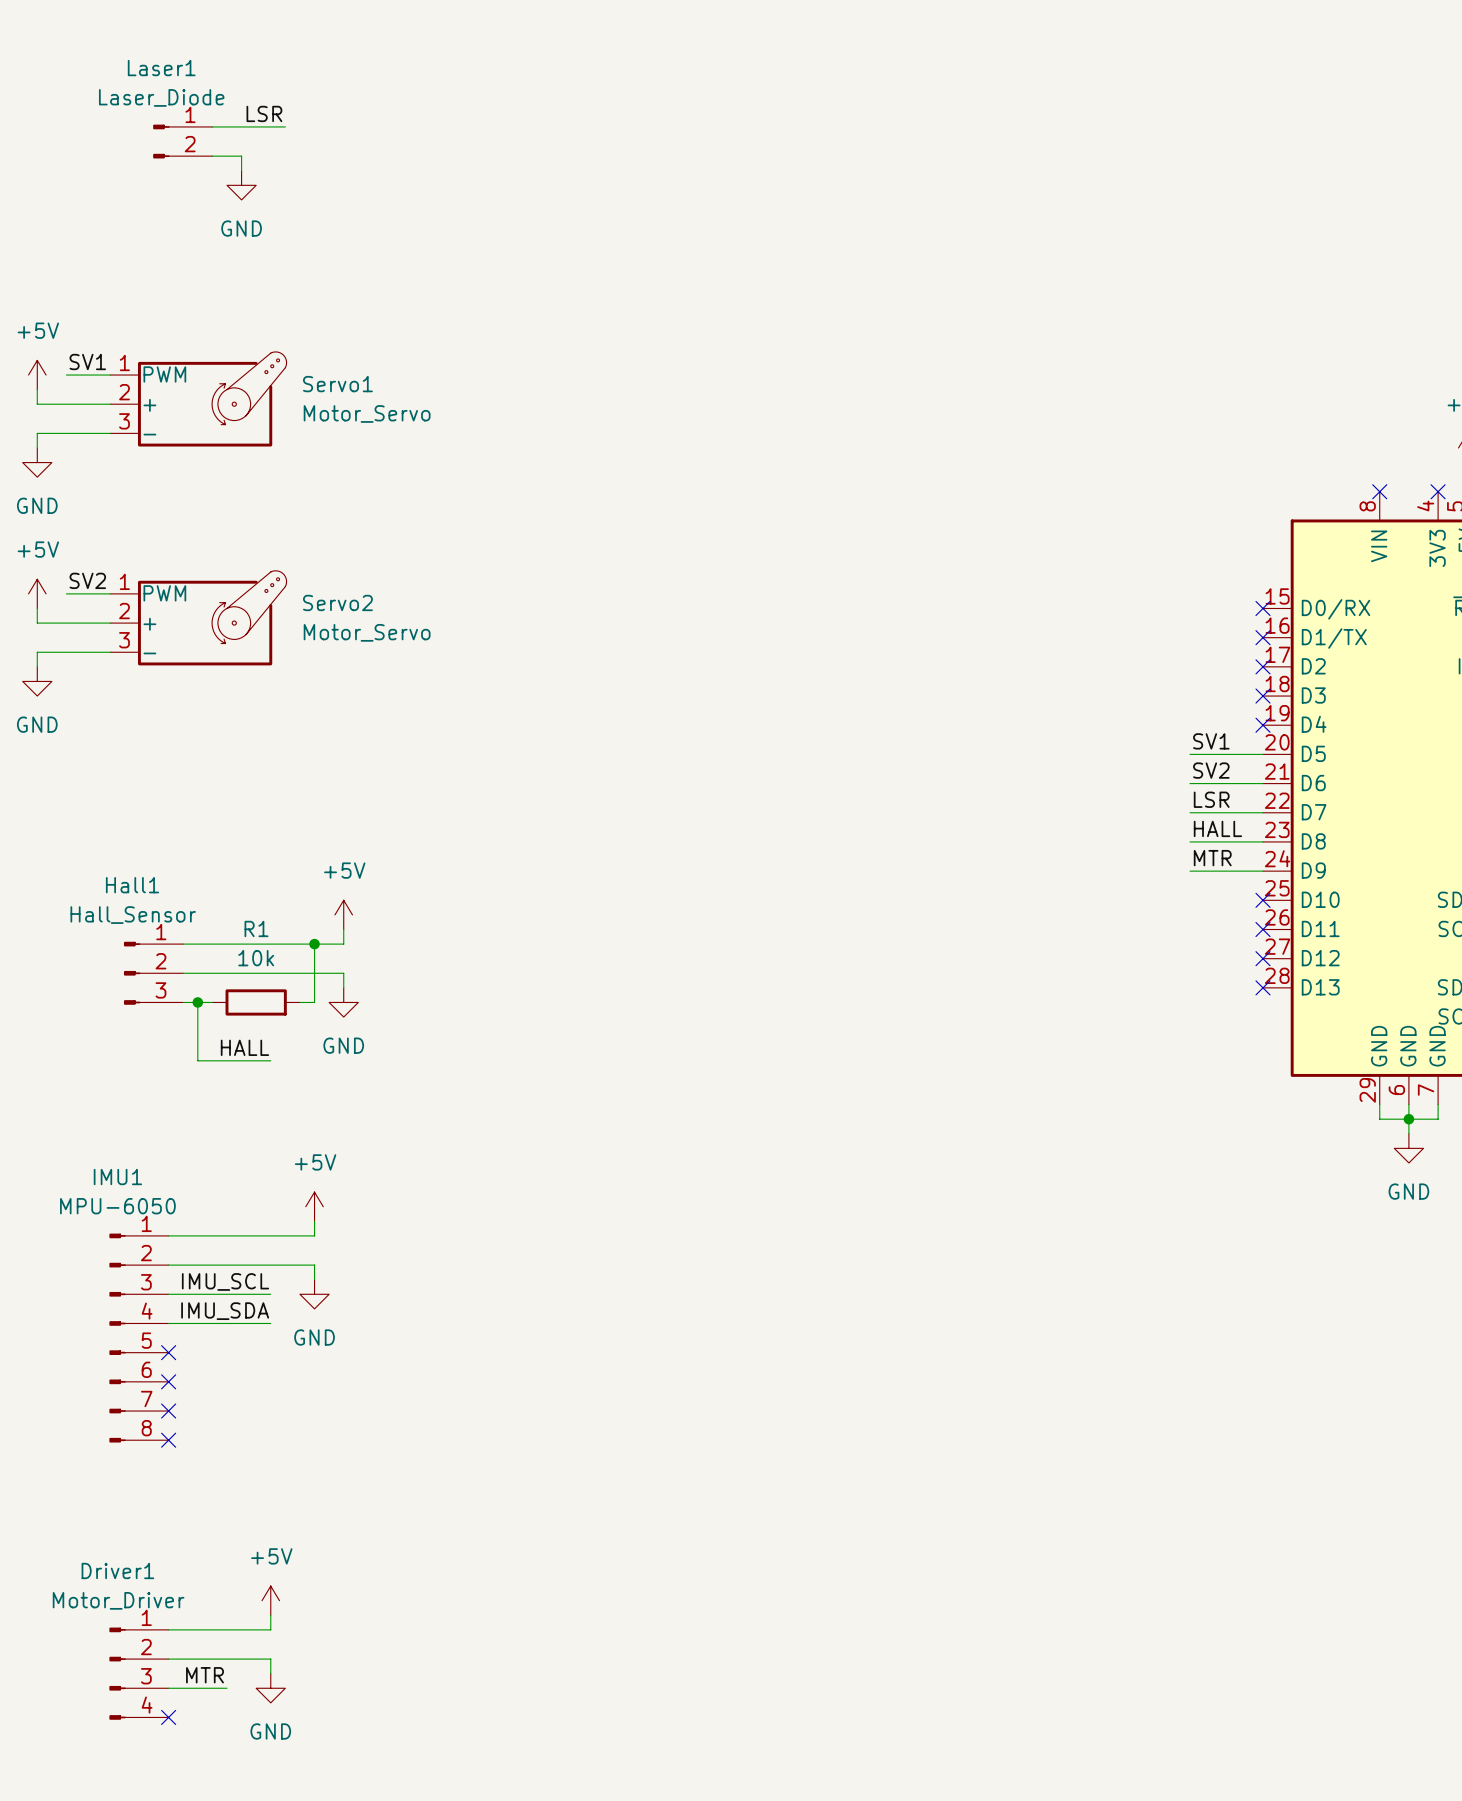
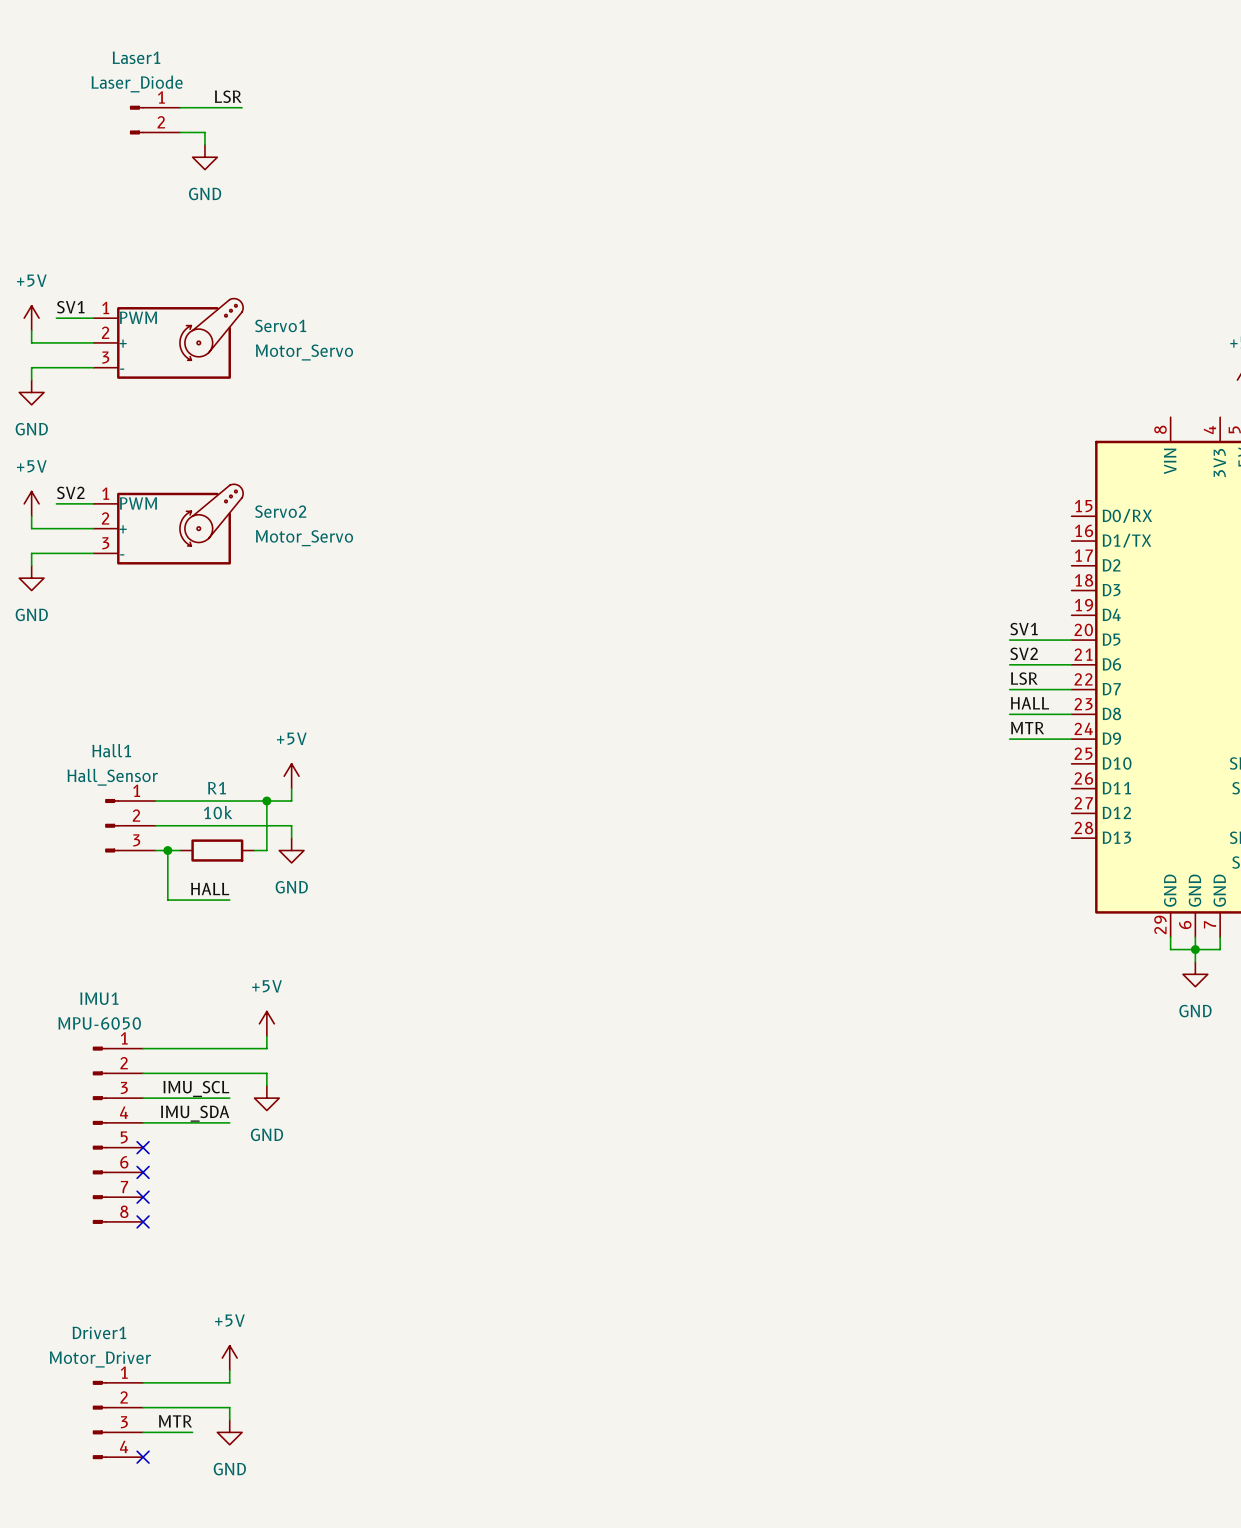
no-connect mark: (1379, 491) -> none
no-connect mark: (1438, 491) -> none
no-connect mark: (1262, 608) -> none
no-connect mark: (1262, 637) -> none
no-connect mark: (1262, 666) -> none
no-connect mark: (1262, 696) -> none
no-connect mark: (1262, 725) -> none
no-connect mark: (1262, 900) -> none
no-connect mark: (1262, 929) -> none
no-connect mark: (1262, 958) -> none
no-connect mark: (1262, 987) -> none

